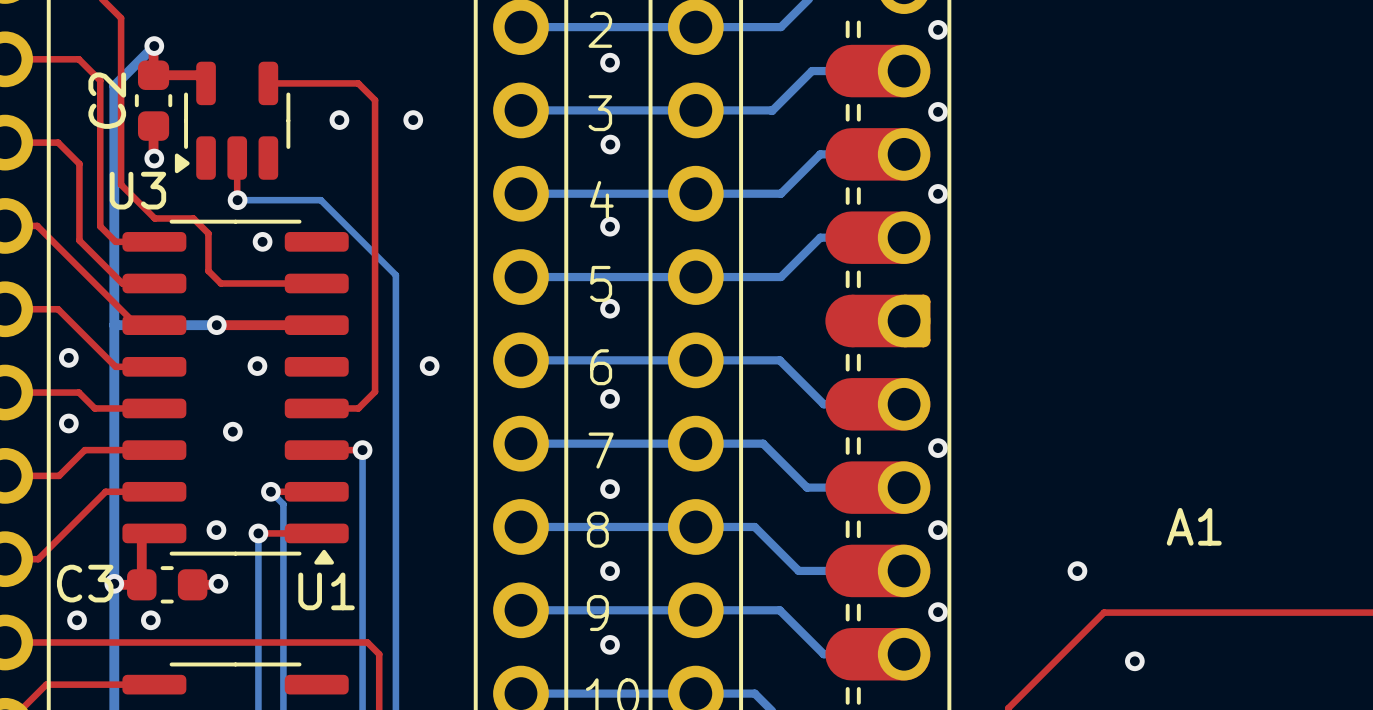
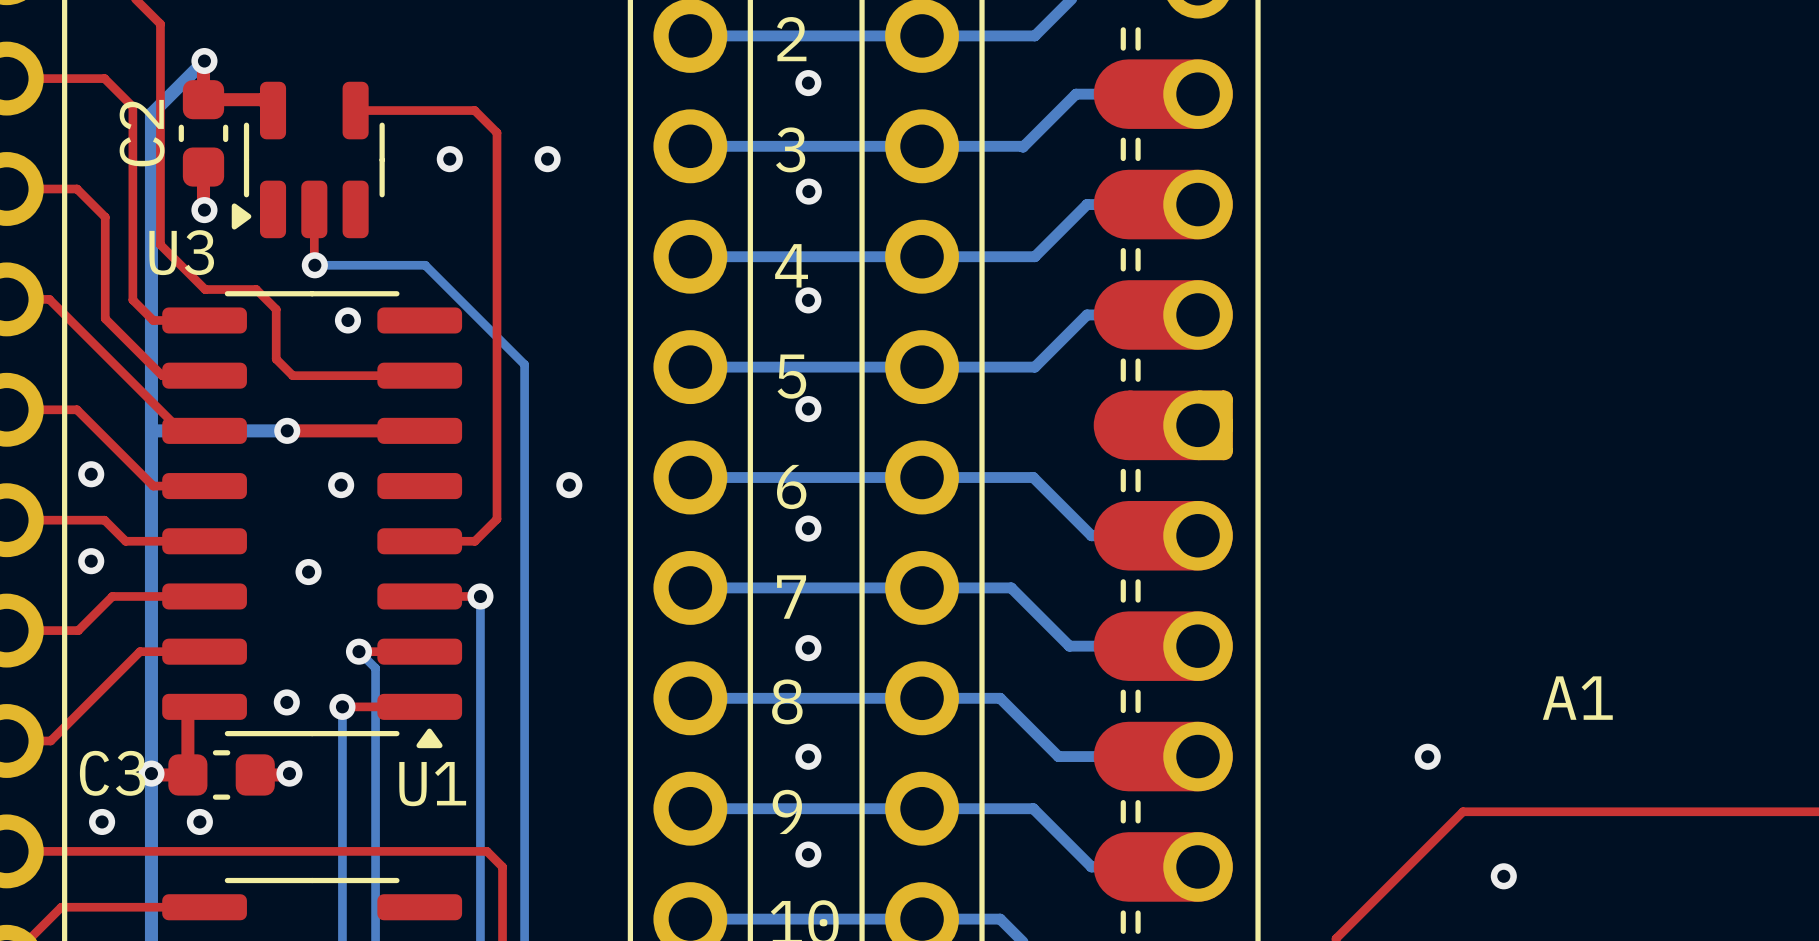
via: (938, 29) -> none
via: (938, 111) -> none
via: (938, 193) -> none
via: (938, 448) -> none
via: (938, 530) -> none
via: (938, 612) -> none

